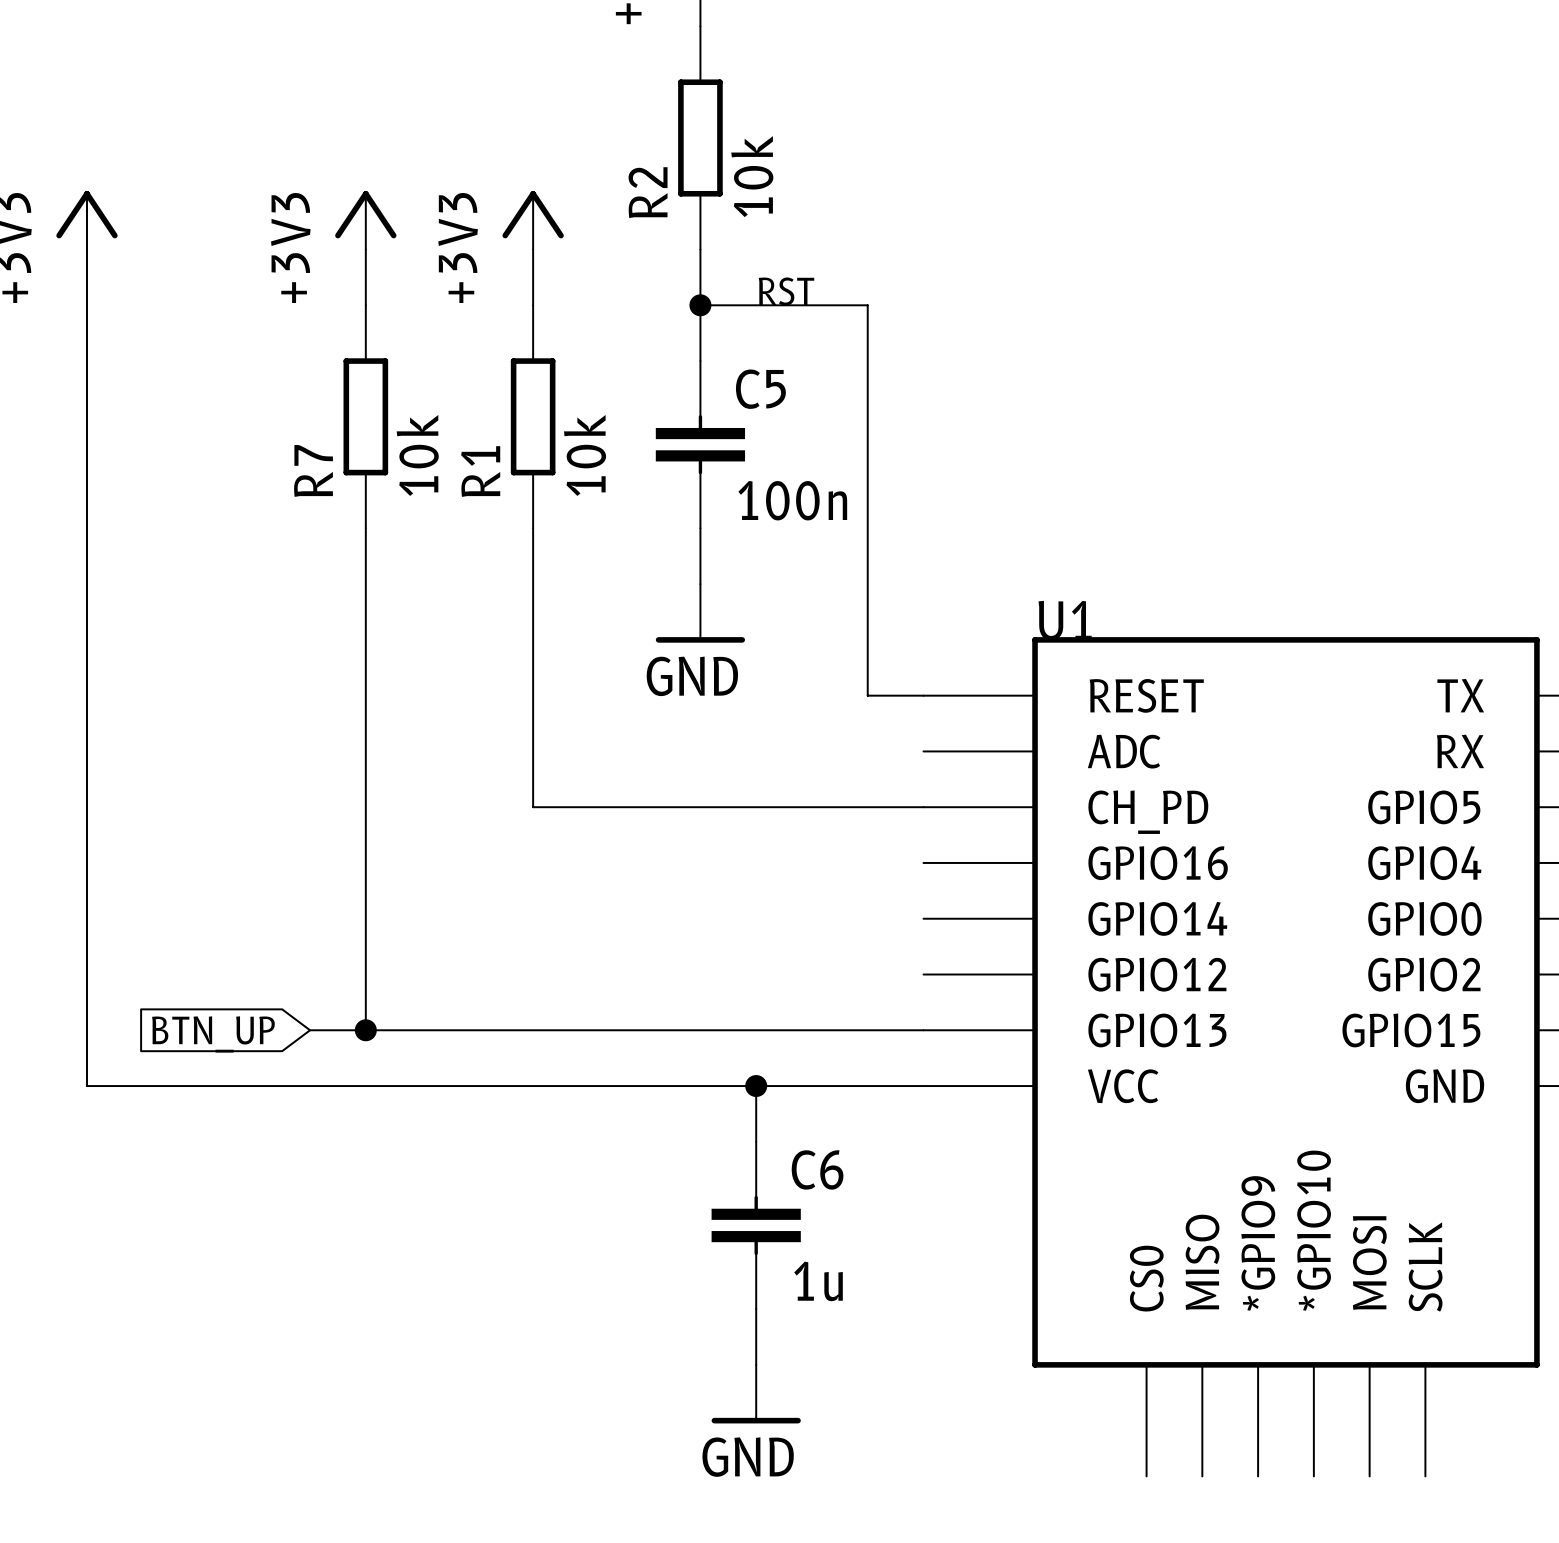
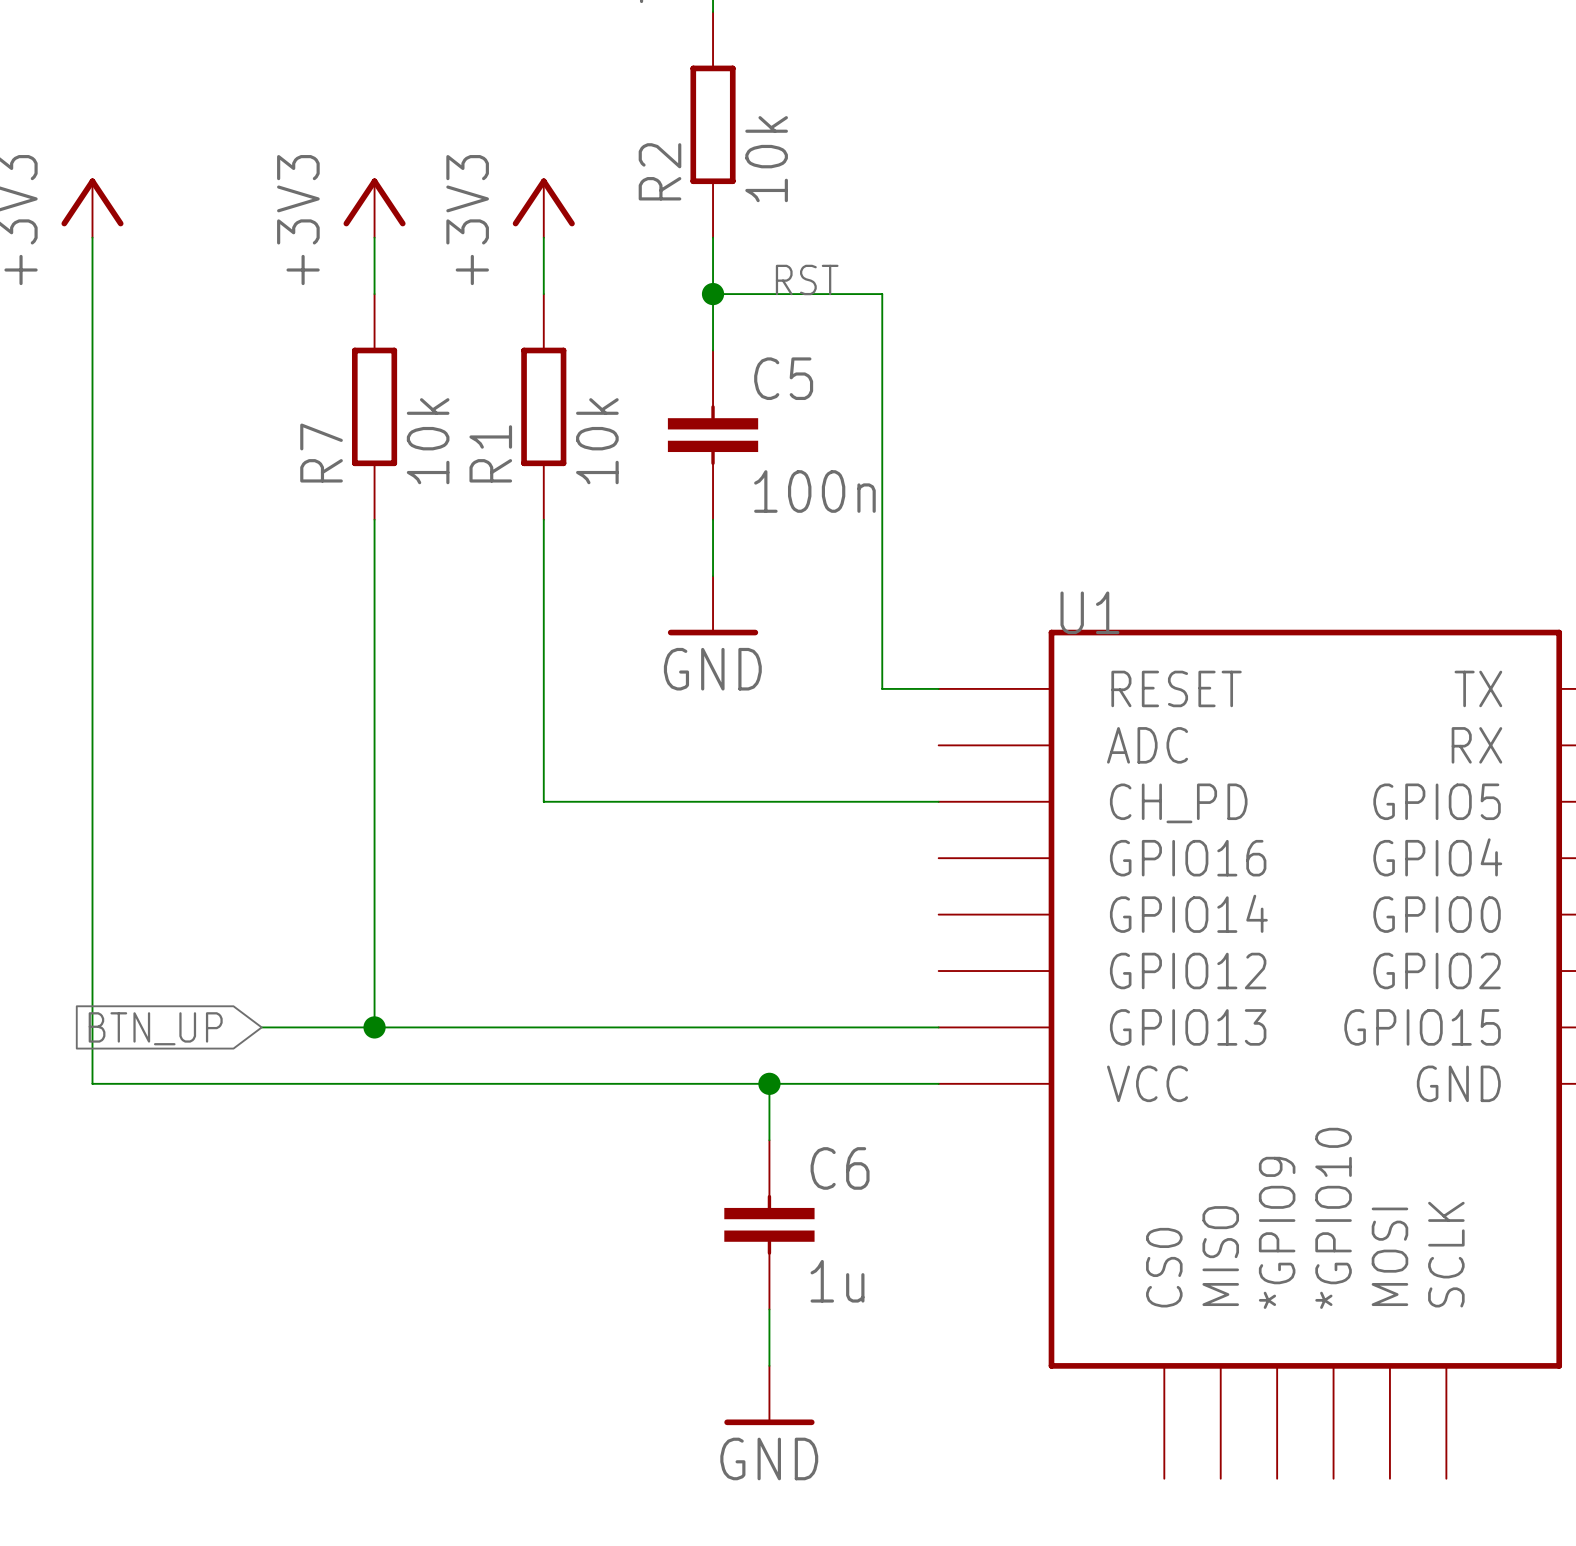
wire: none -> (261, 1027) (318, 1027)
global label position: BTN_UP (213, 1034) -> BTN_UP (155, 1028)

